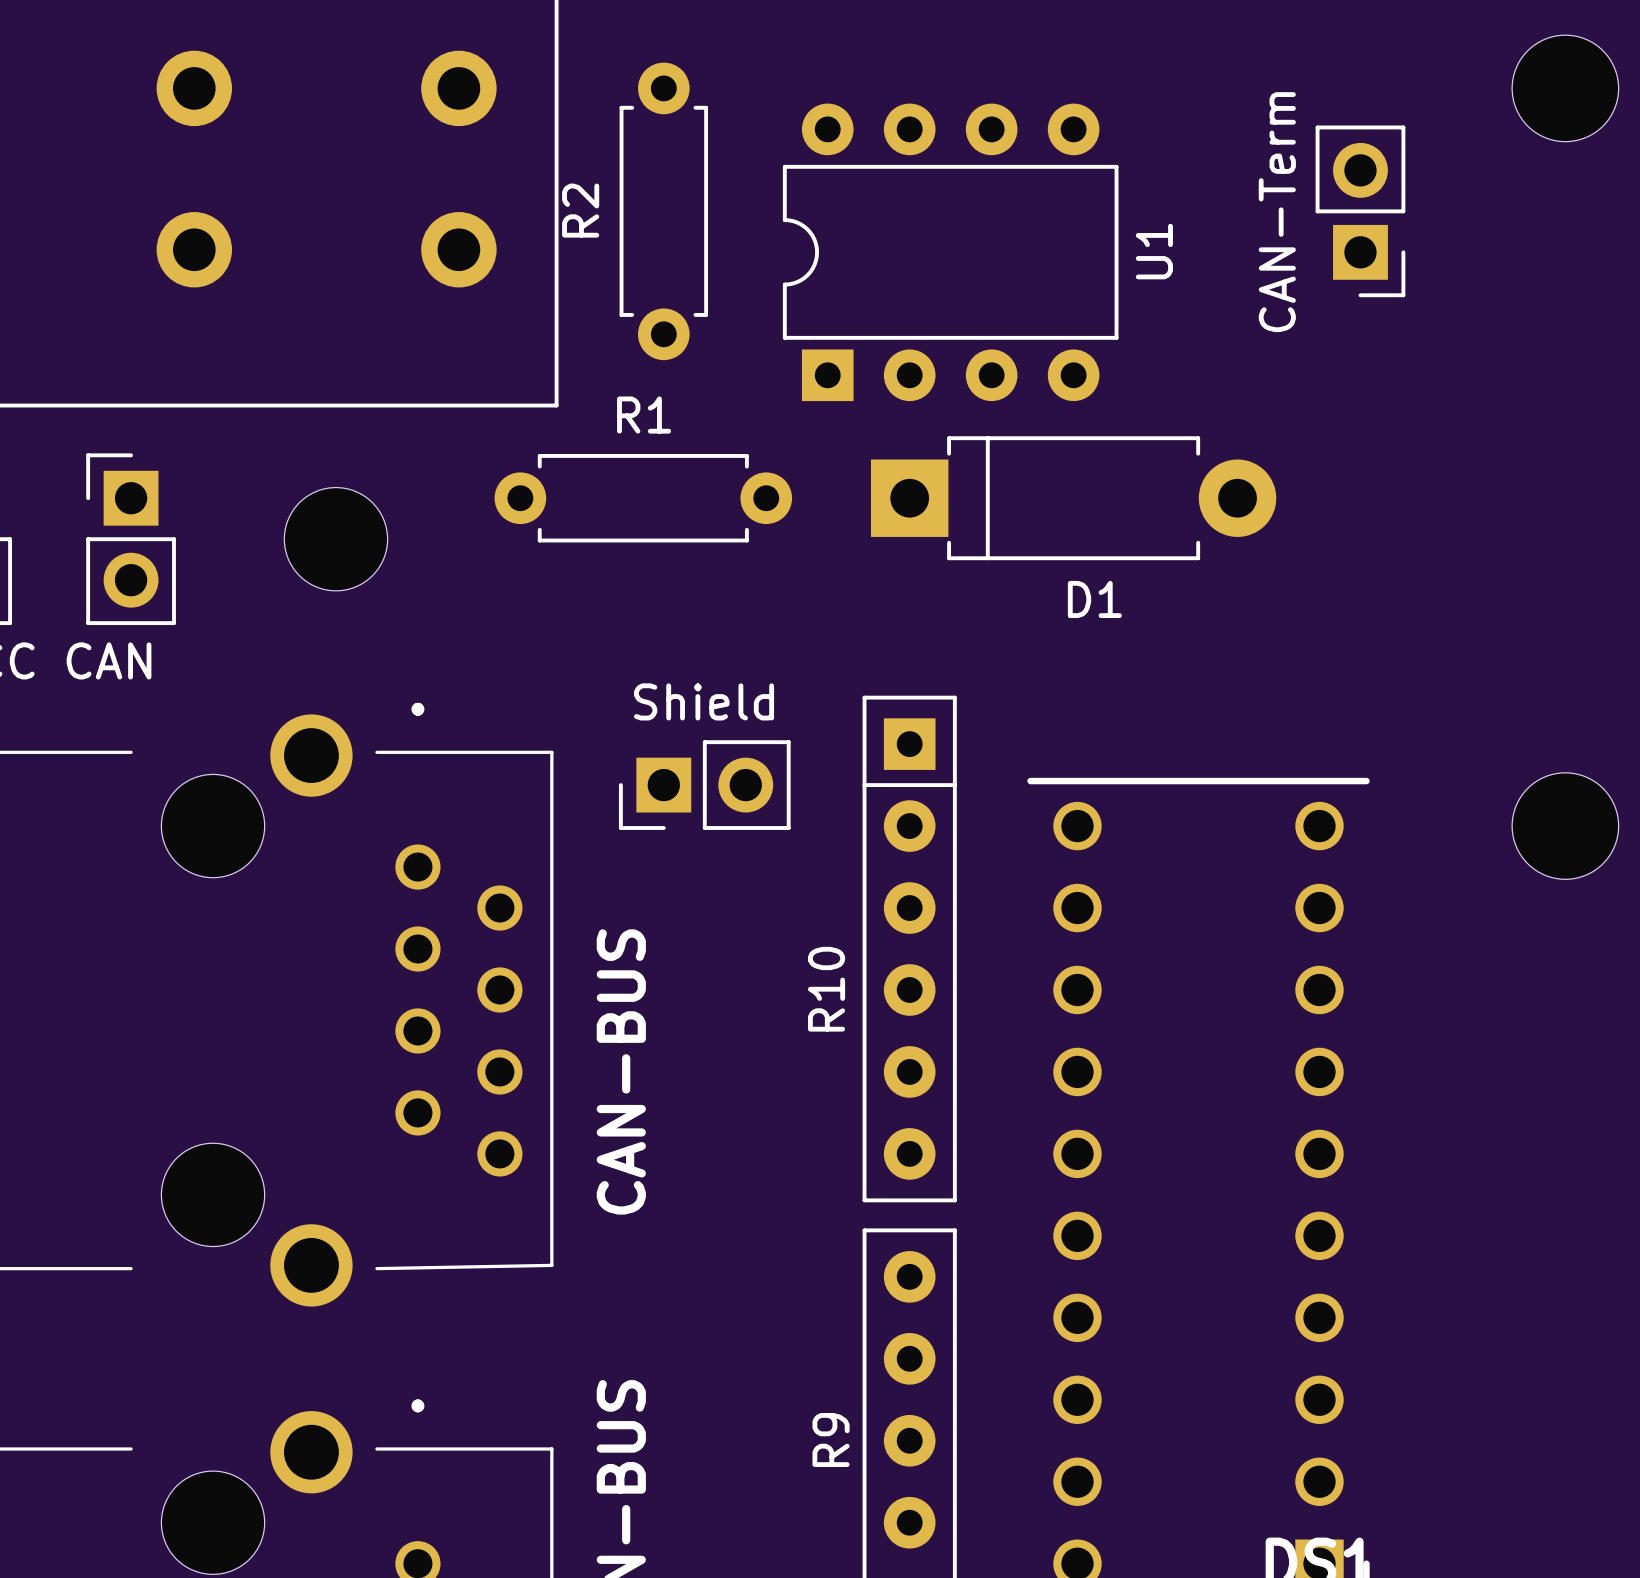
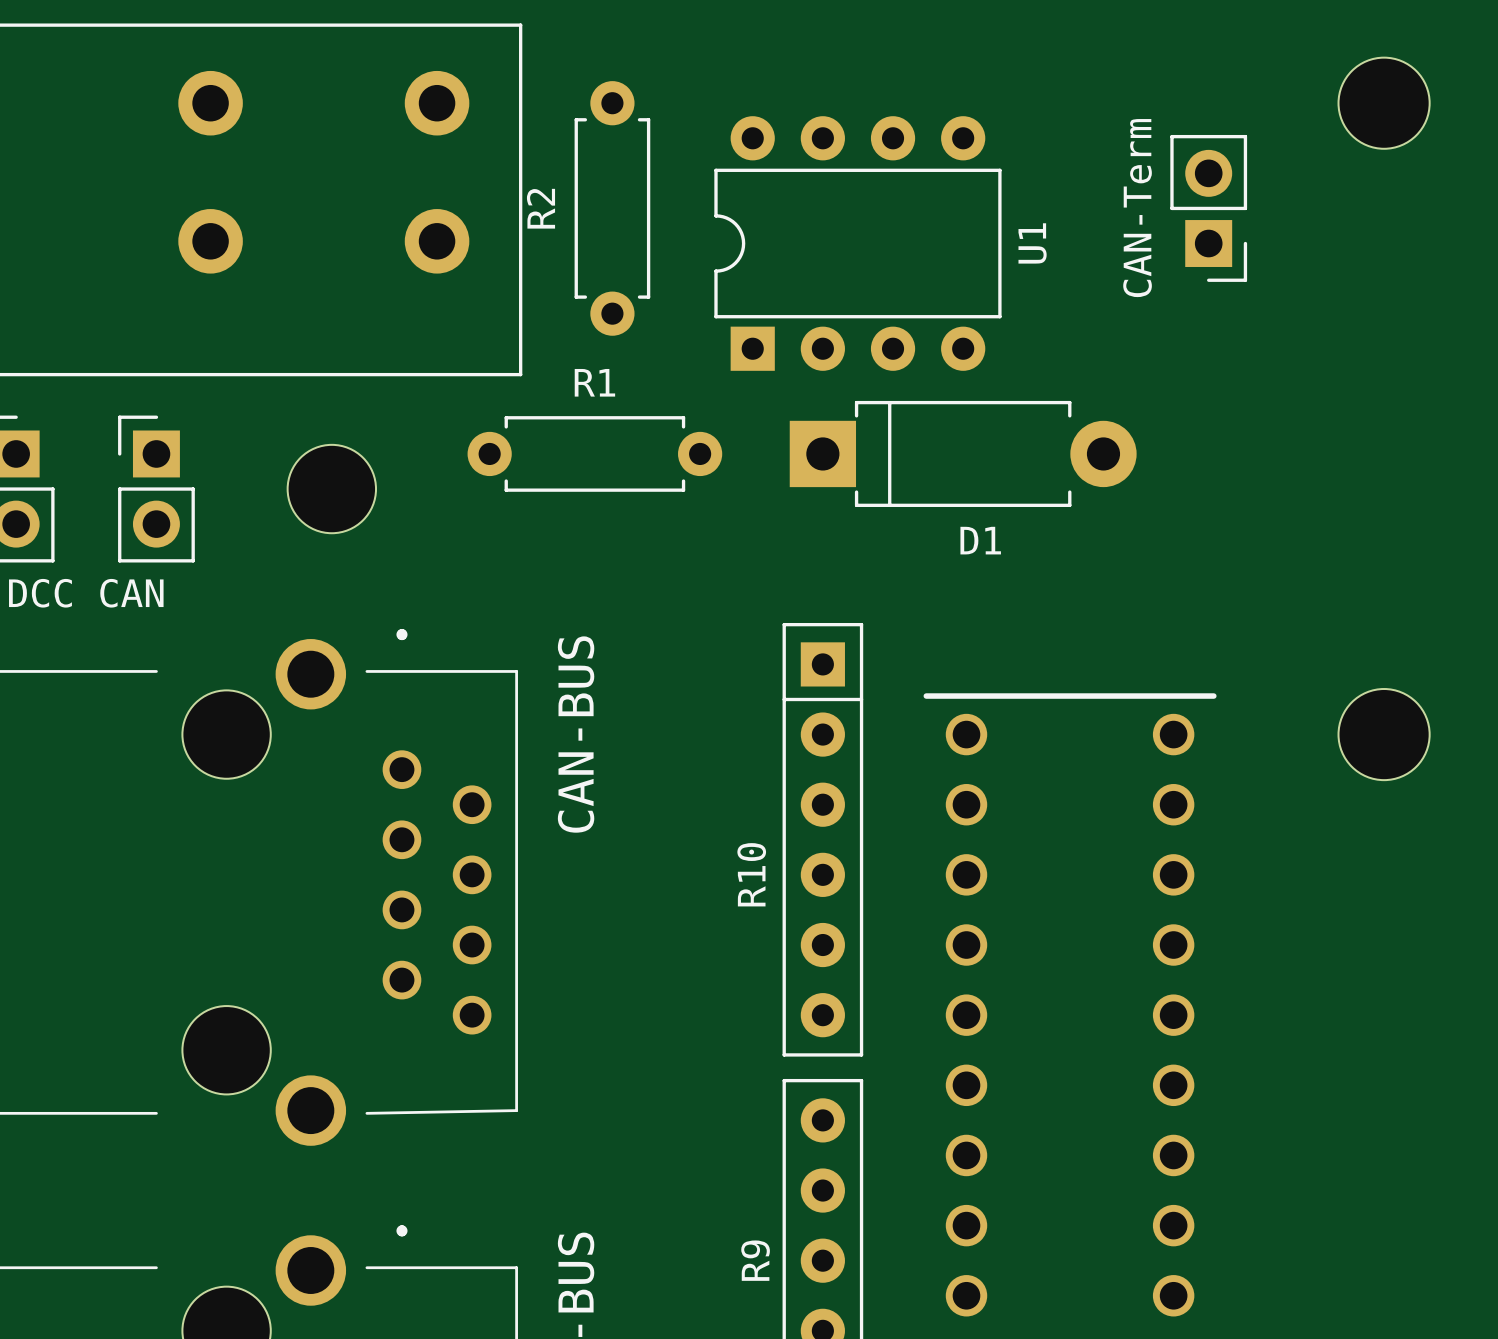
part: Shield (704, 785) -> none
part value position: CAN-BUS (621, 1071) -> CAN-BUS (576, 734)

